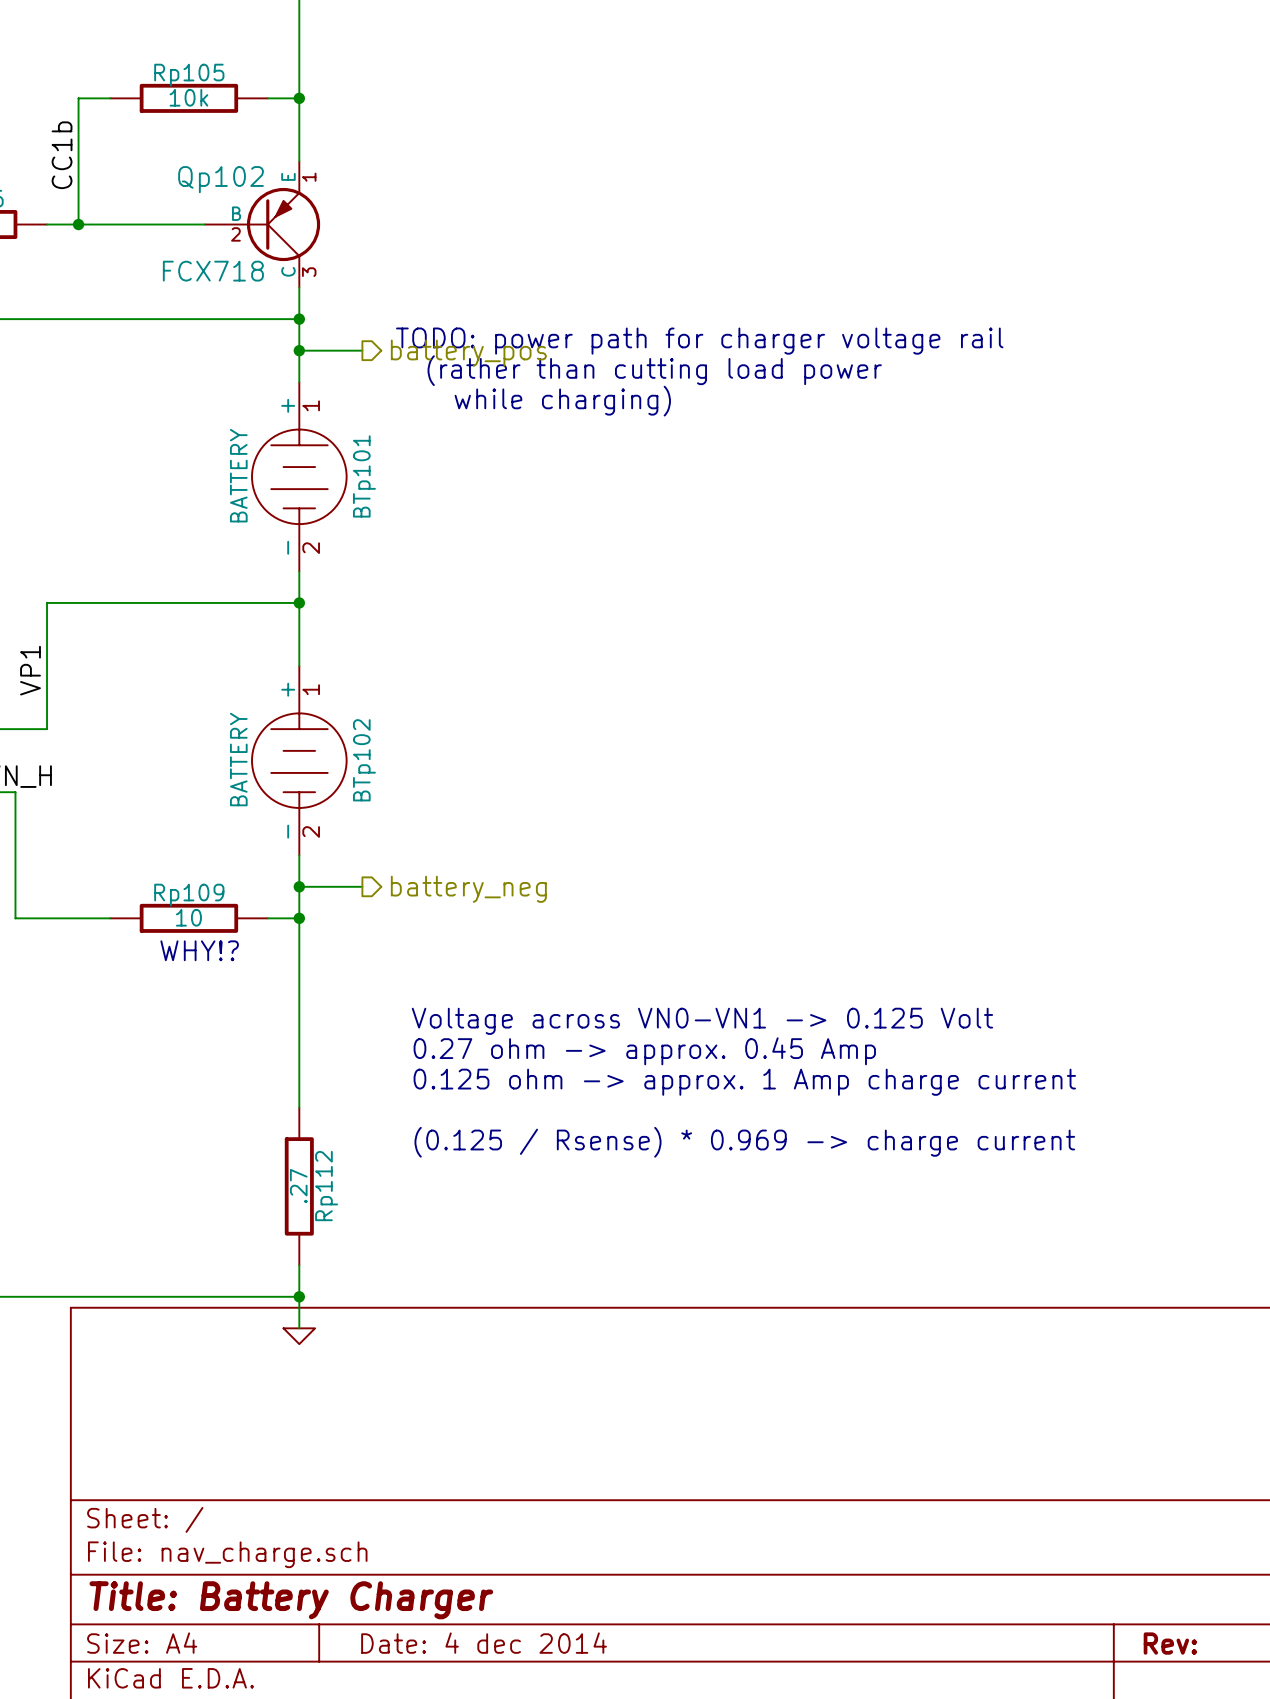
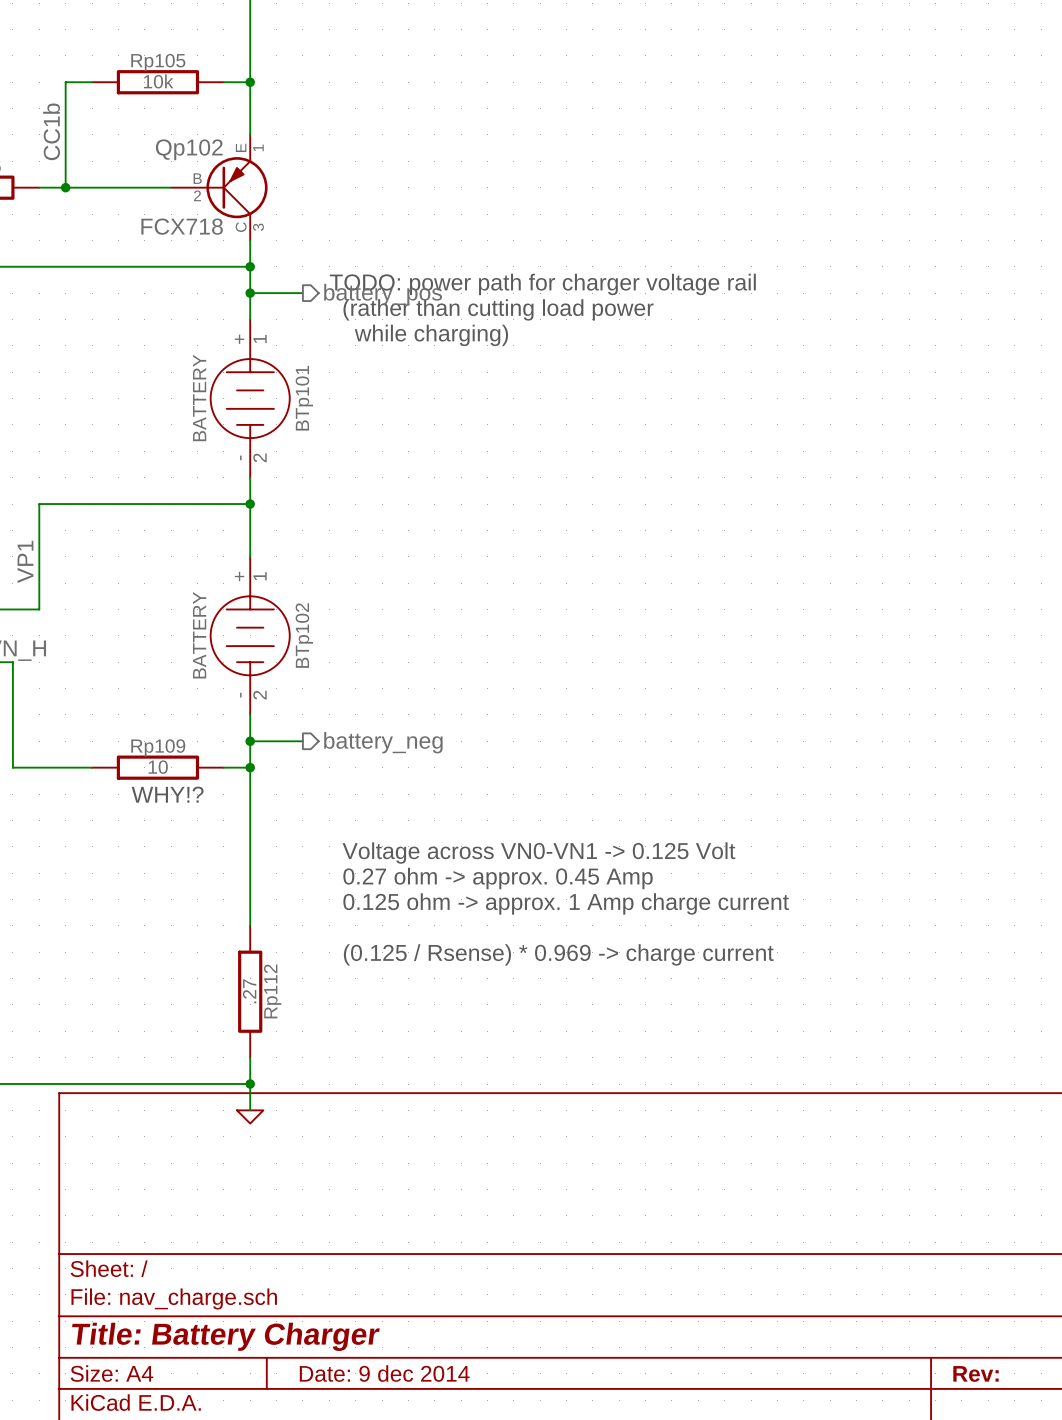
title block: Date: 4 dec 2014 (484, 1643) -> Date: 9 dec 2014 (384, 1373)

